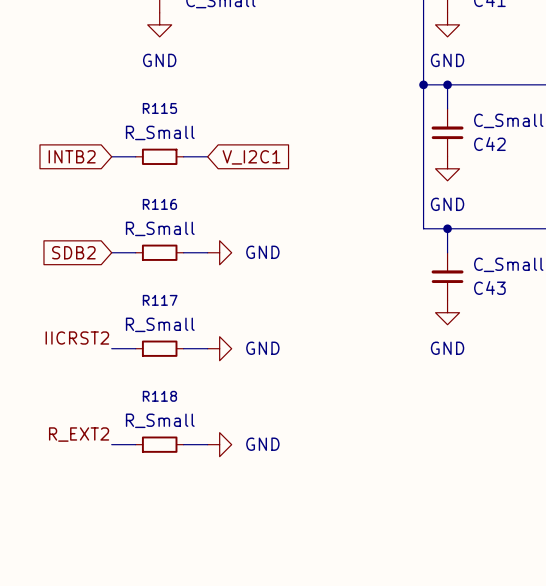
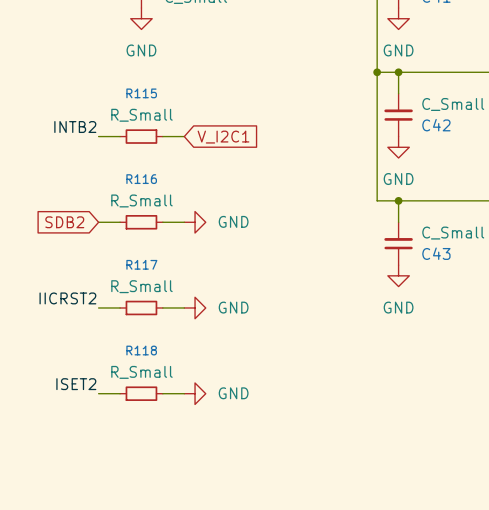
label: none -> INTB2 (75, 127)
global label: INTB2 (72, 156) -> none
label: R_EXT2 (79, 434) -> ISET2 (76, 384)

